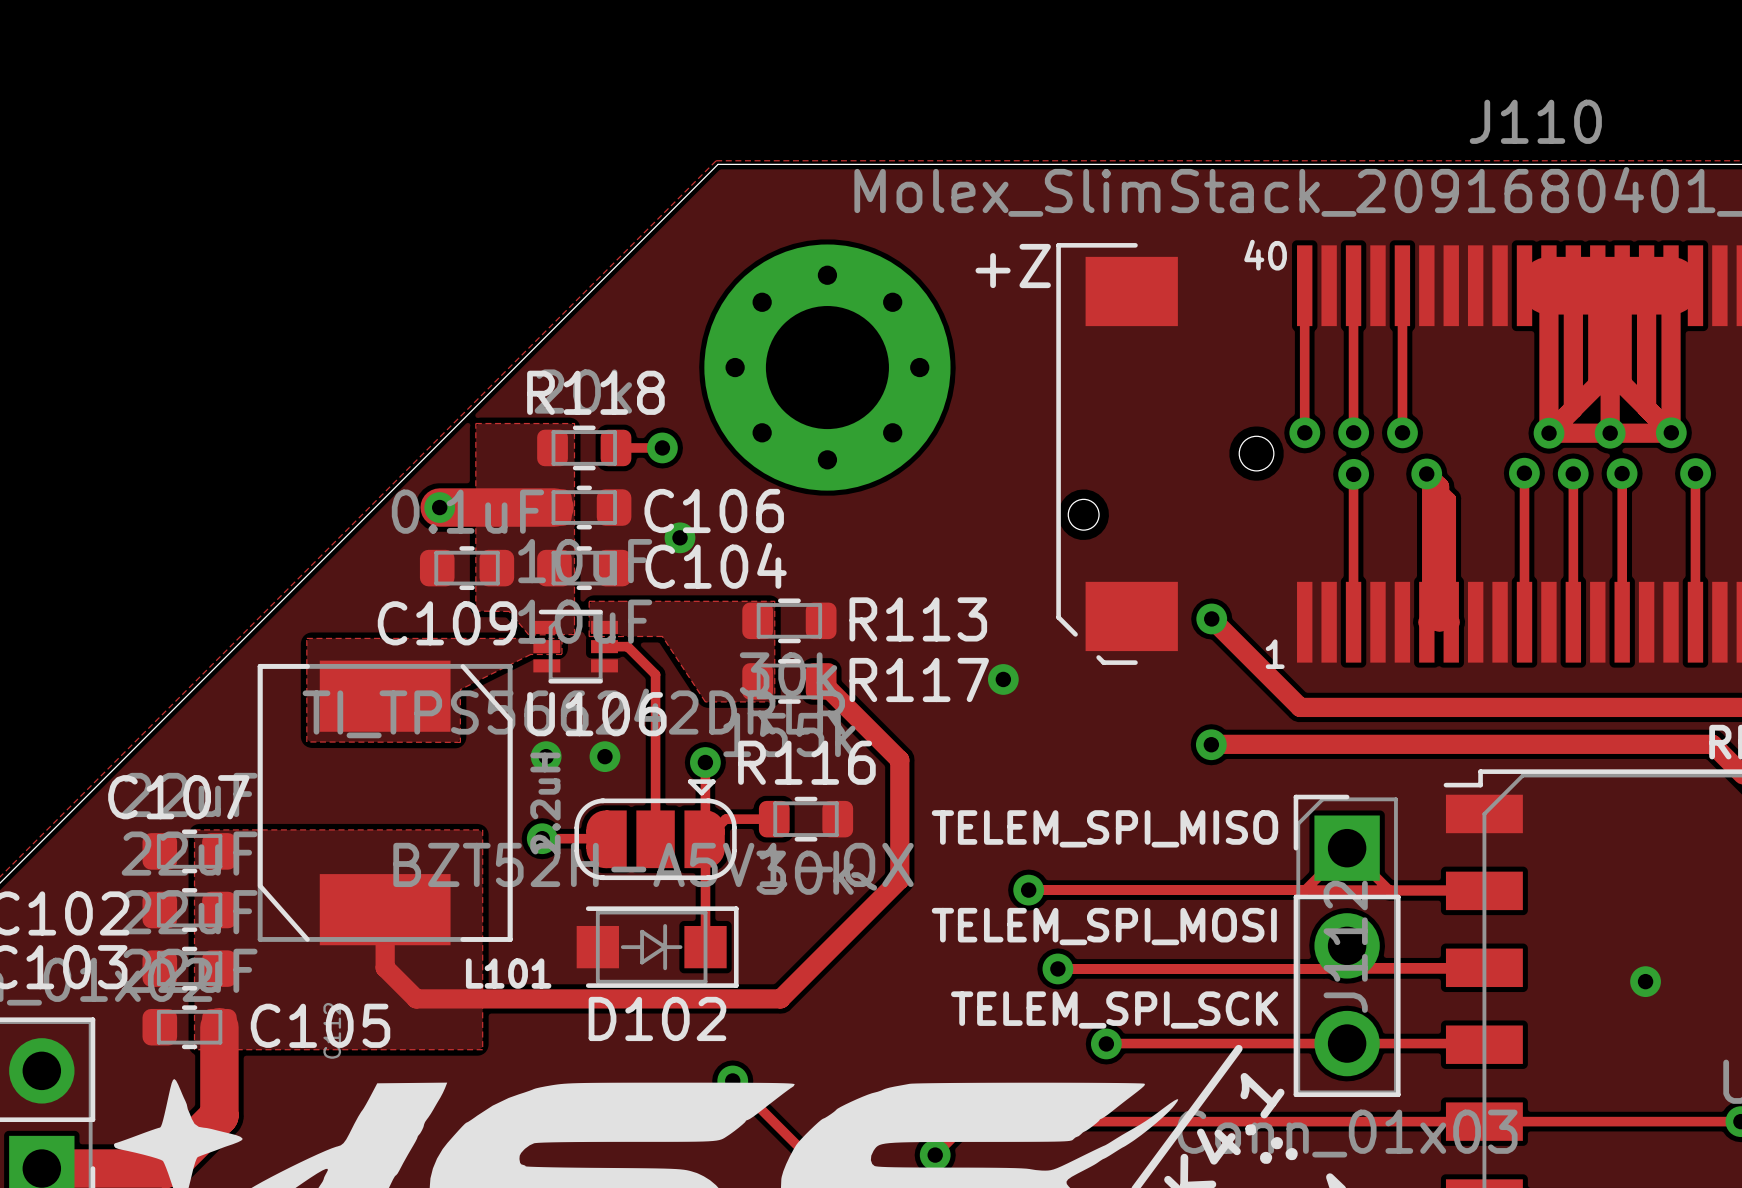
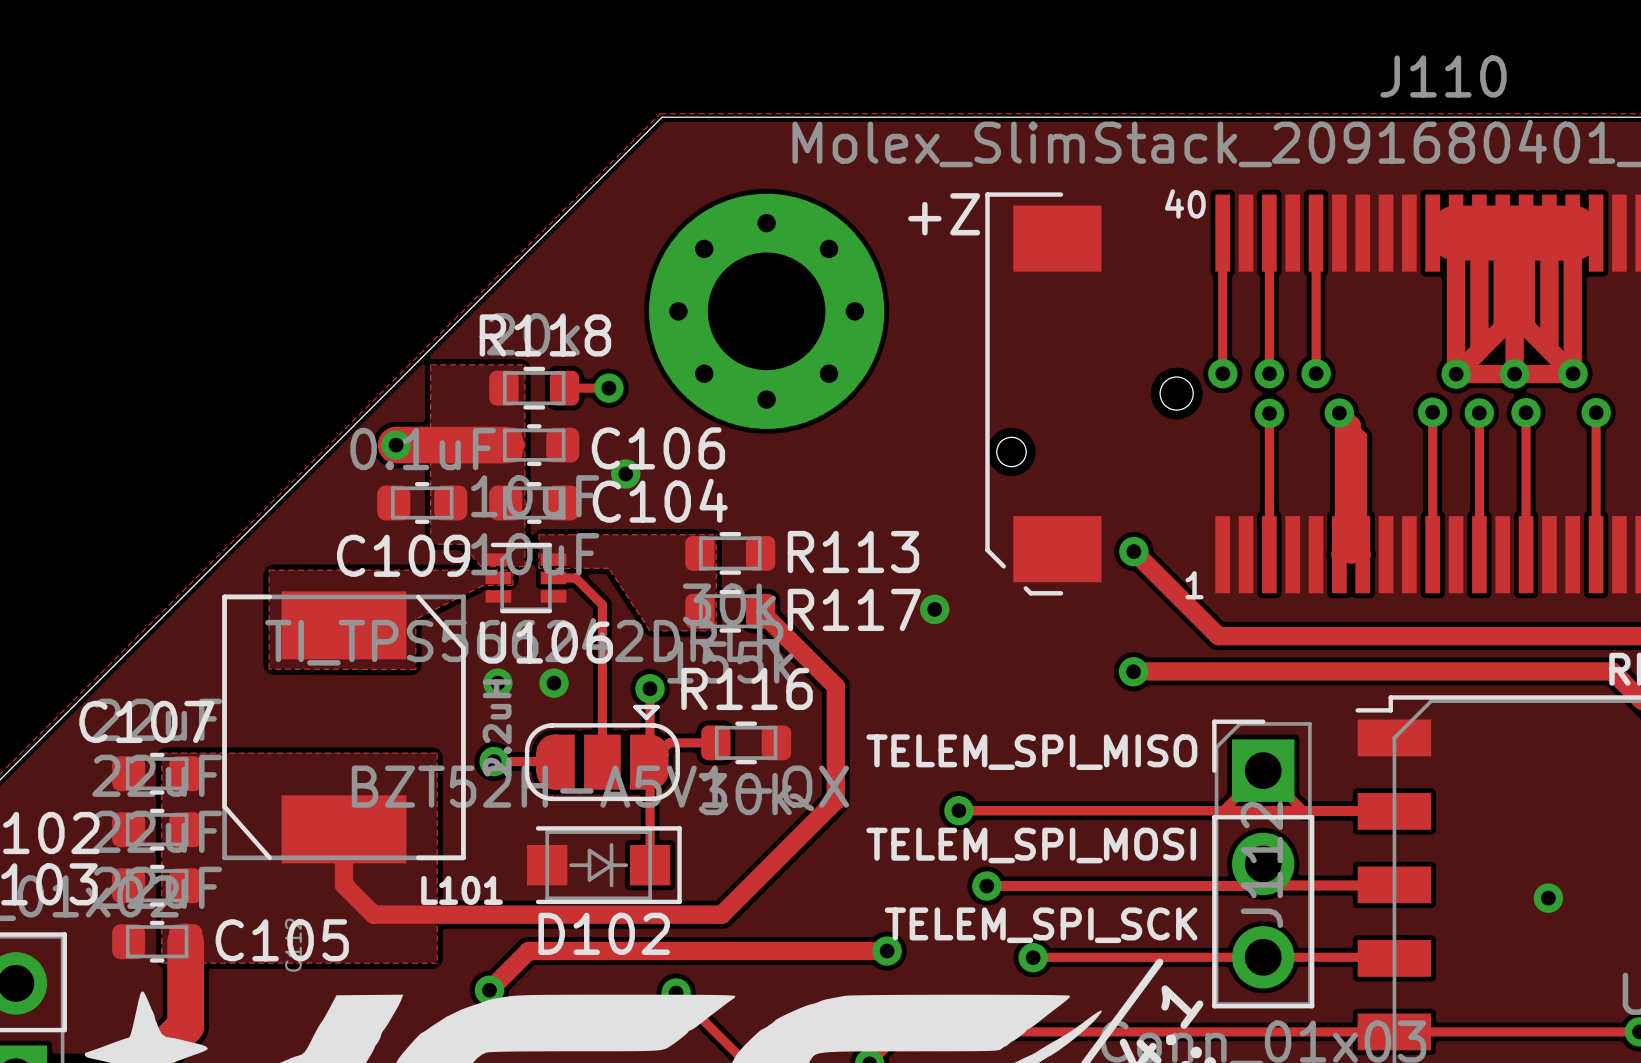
track: none -> (887, 951) (528, 951) (489, 990)
via: none -> (887, 951)
via: none -> (489, 990)

